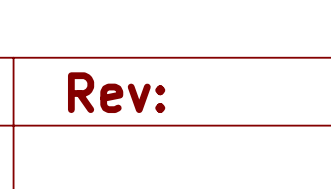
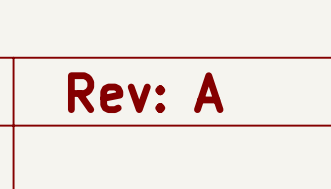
title block: Rev: (116, 92) -> Rev: A (145, 92)

